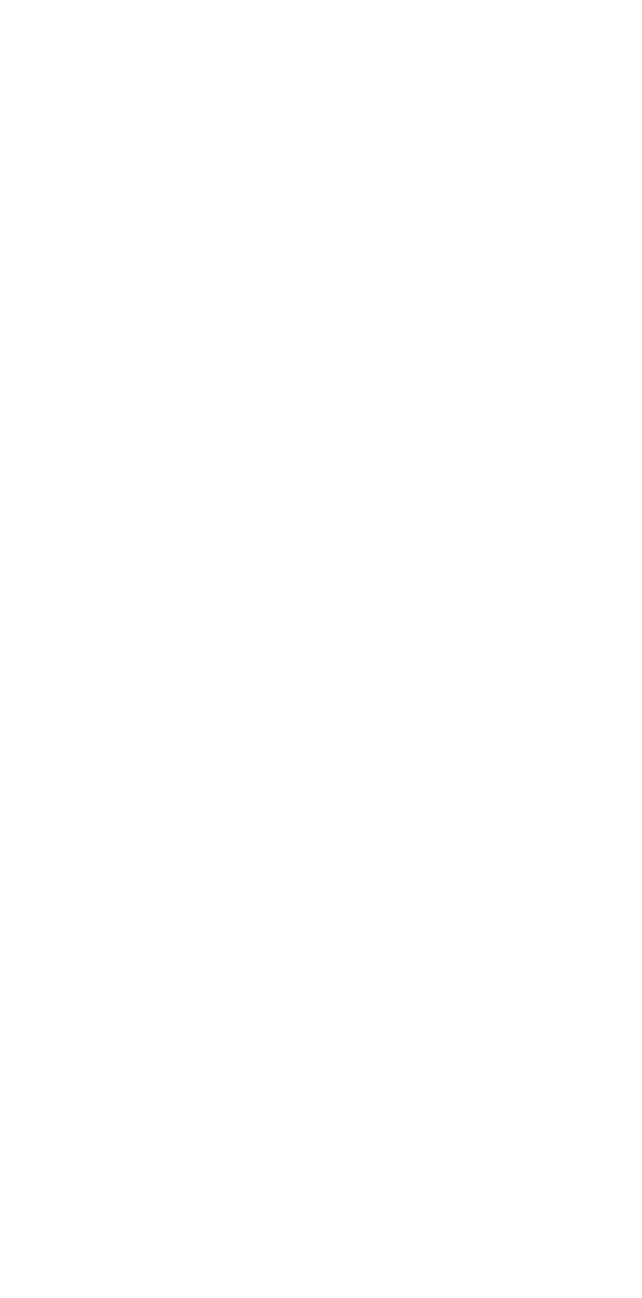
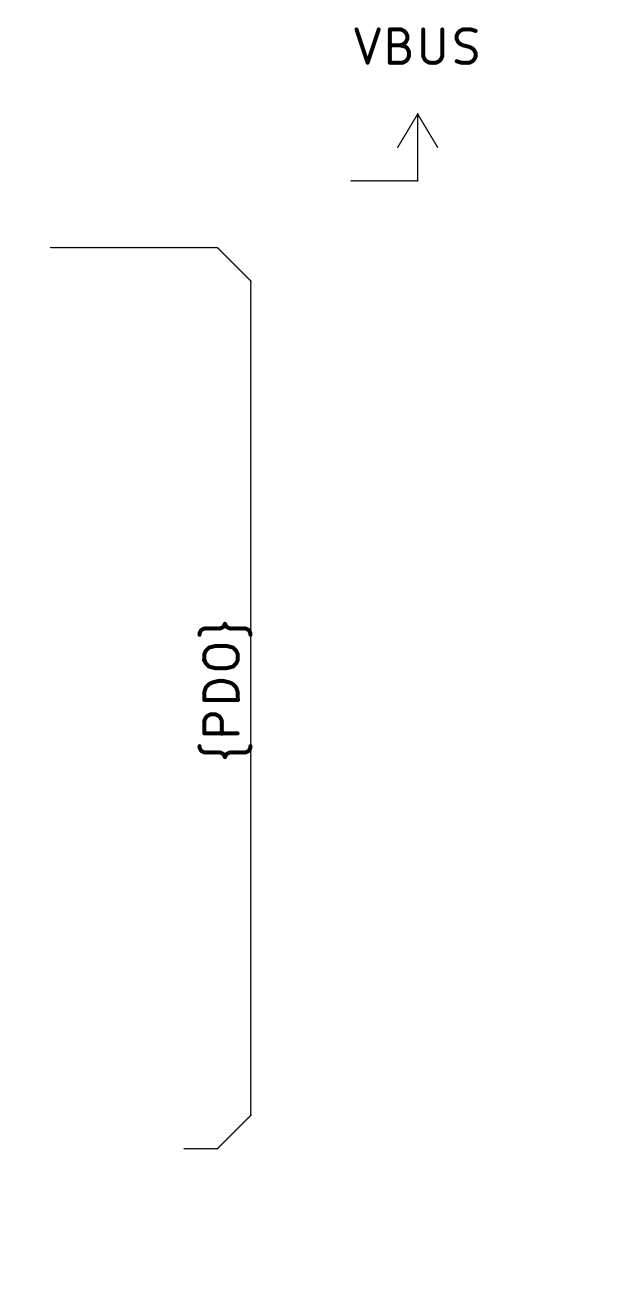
power symbol: none -> VBUS (417, 147)
wire: none -> (350, 180) (417, 180)
bus: none -> (50, 247) (217, 247) (250, 280) (250, 1115) (217, 1148) (184, 1148)
label: none -> {PDO} (224, 690)

